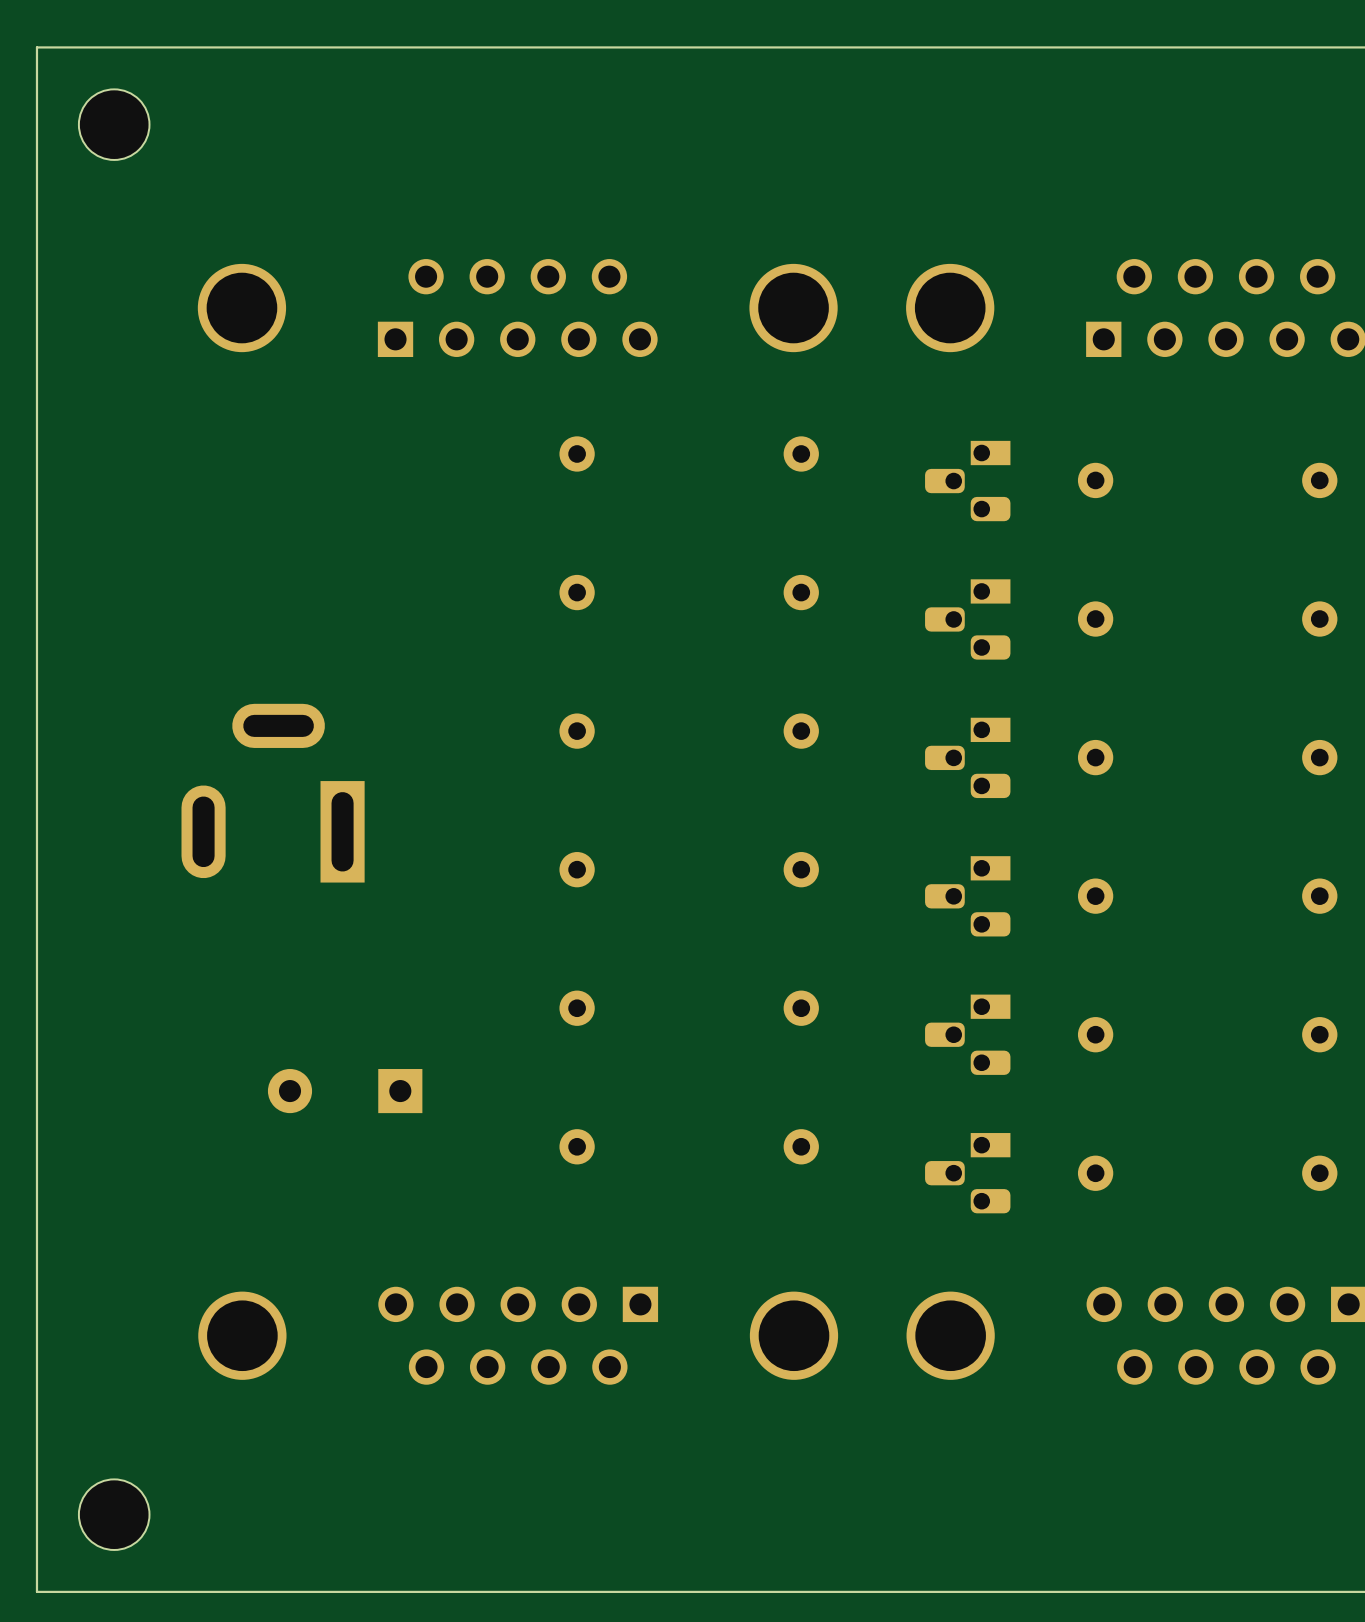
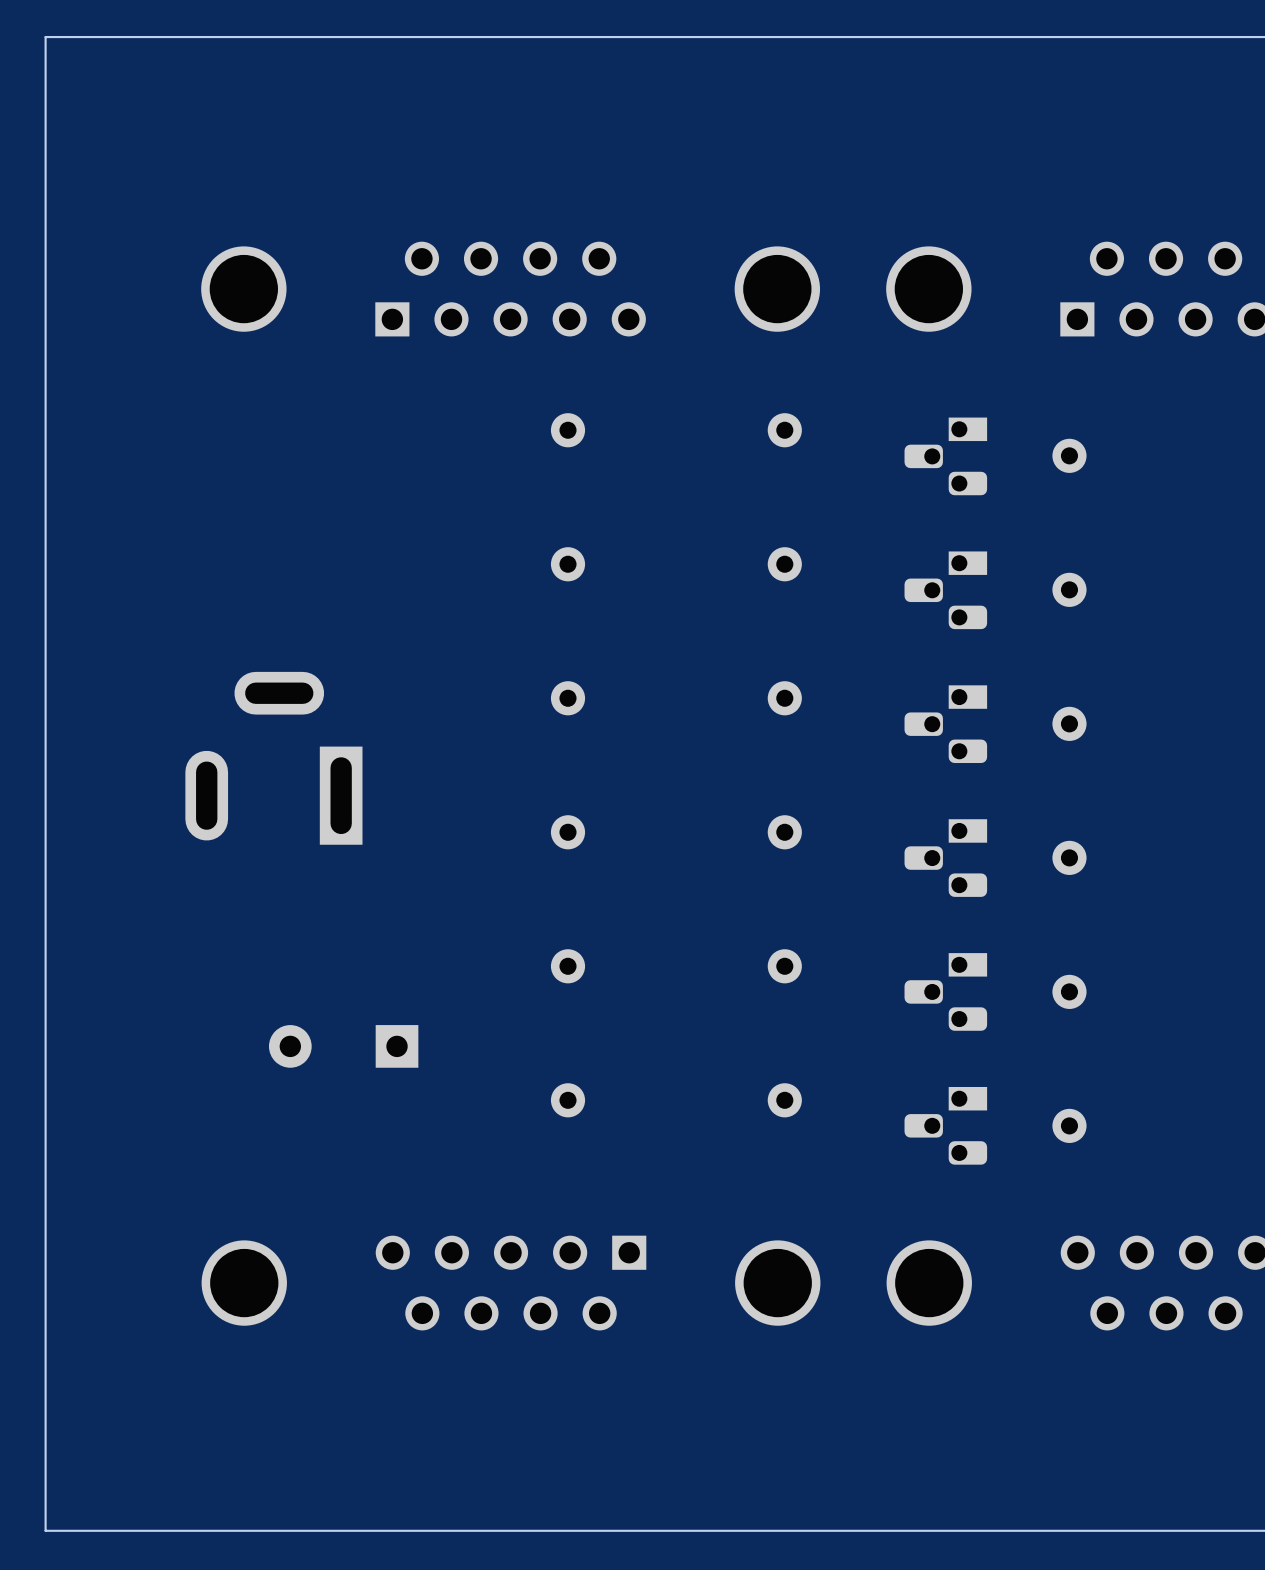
part: (114, 124) -> none
part: (114, 1514) -> none

